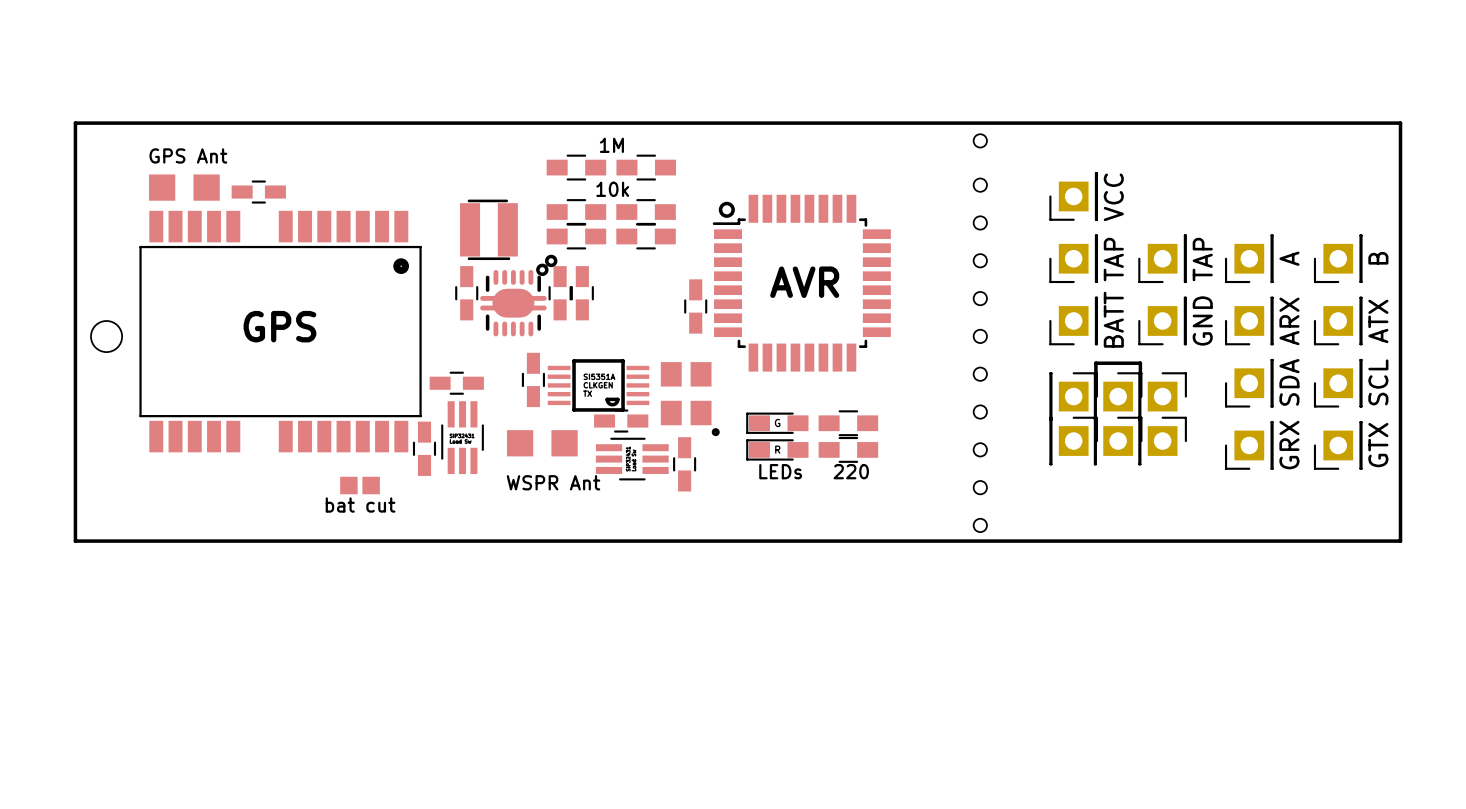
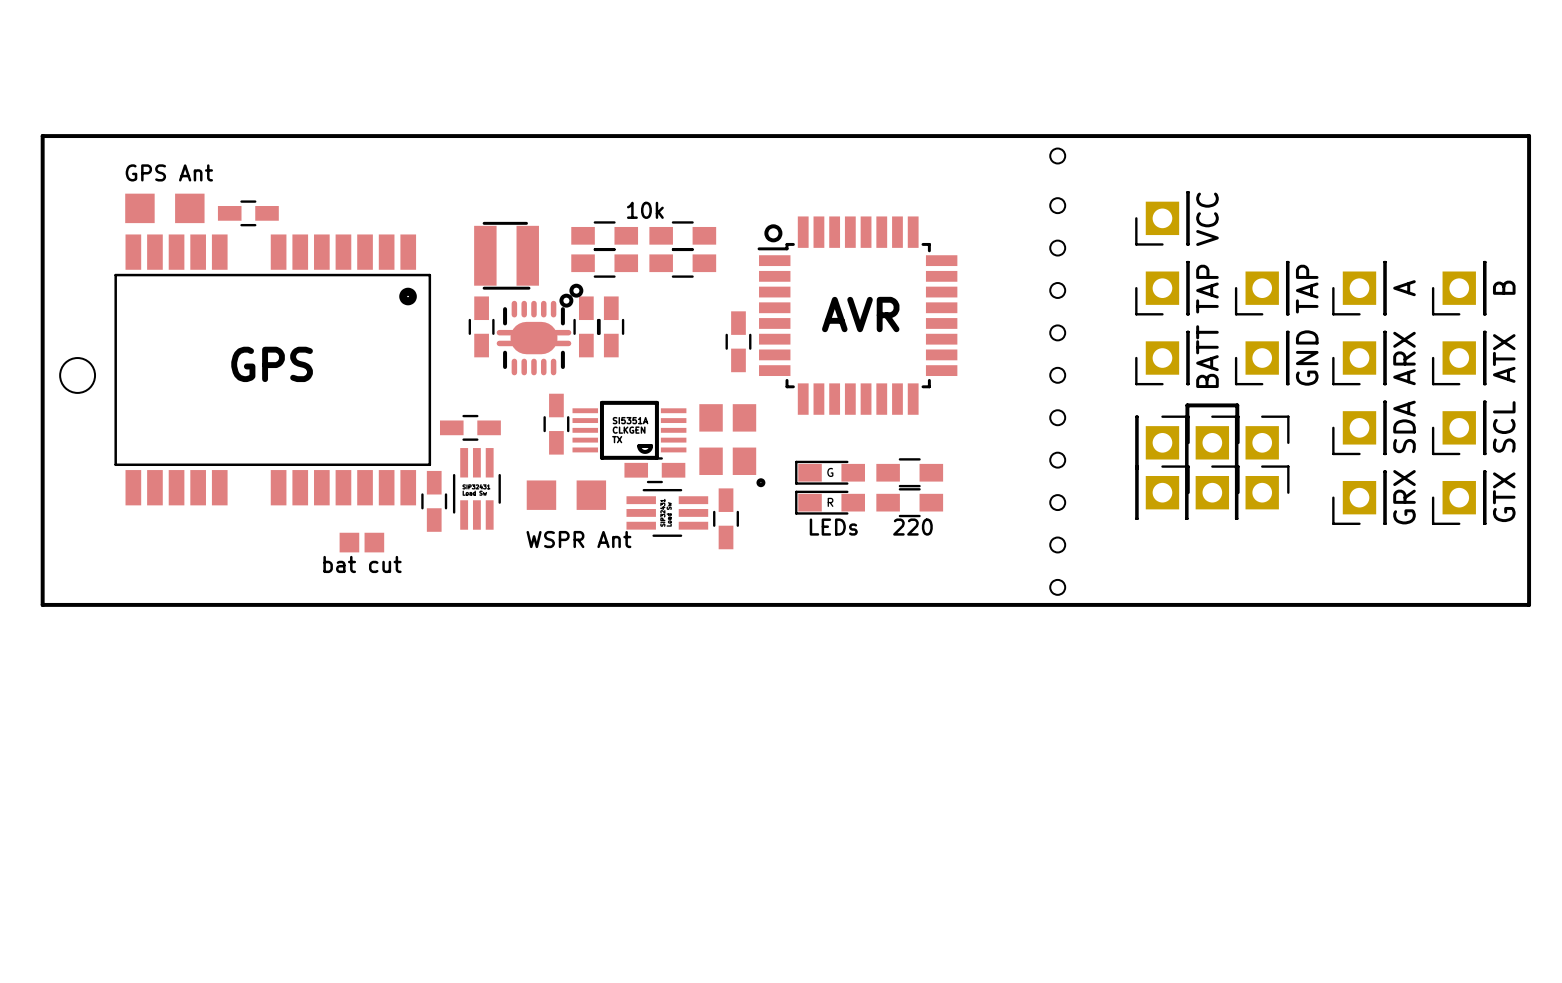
text: 1M (611, 145) -> none
part: (576, 167) -> none
part: (646, 167) -> none

